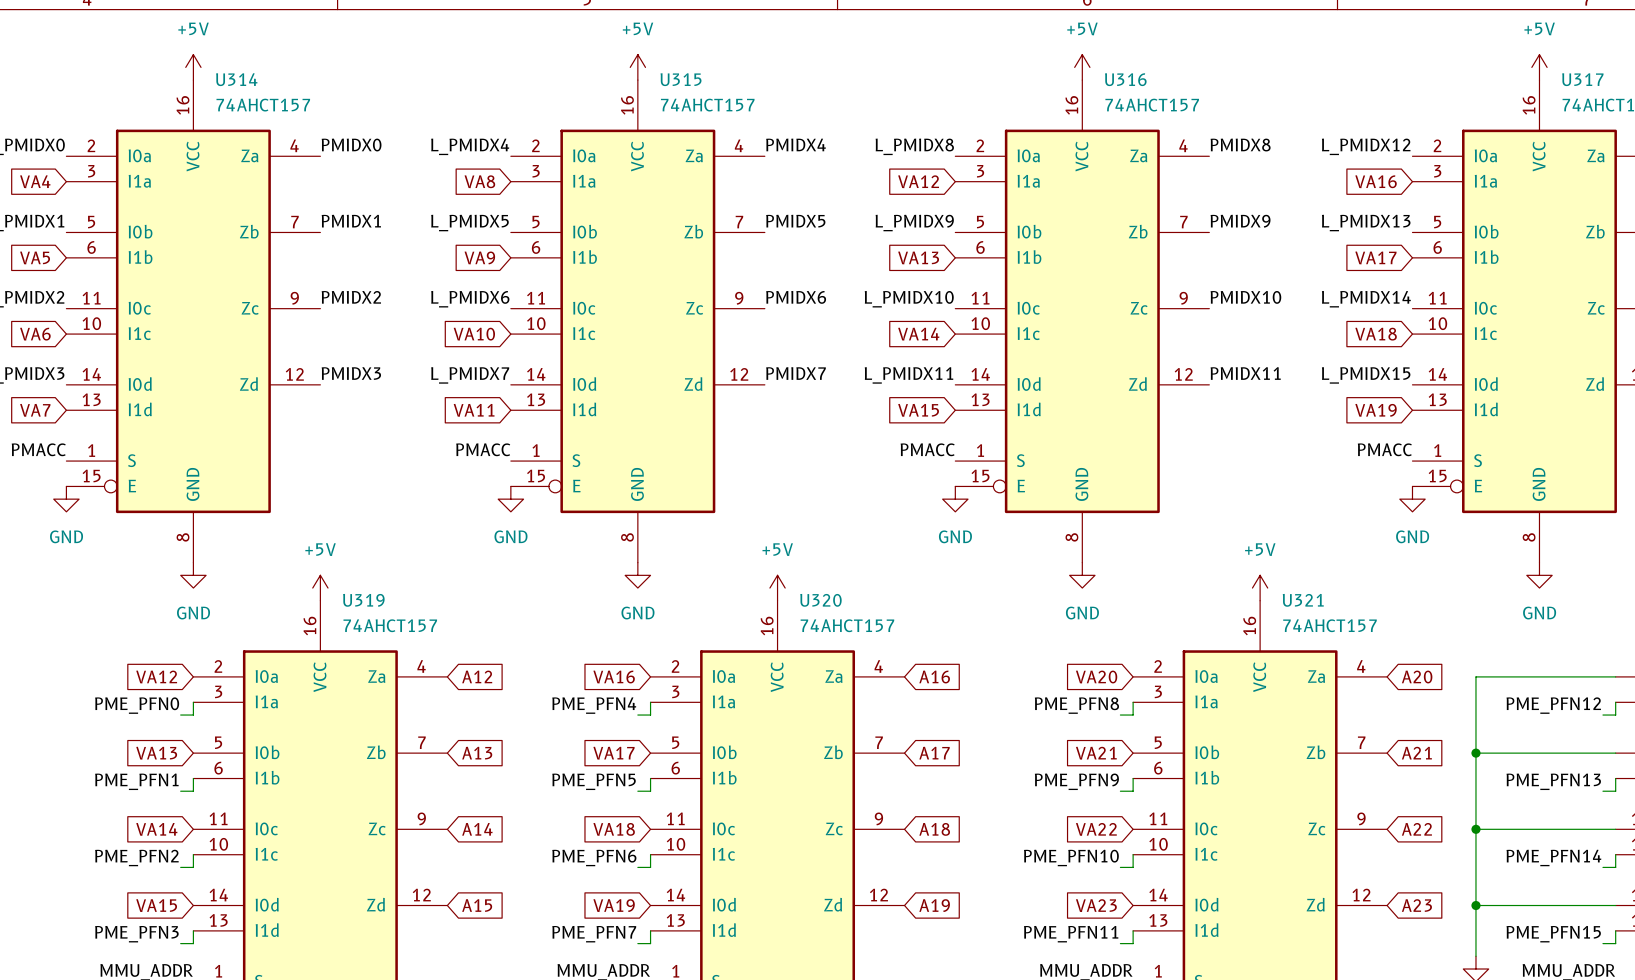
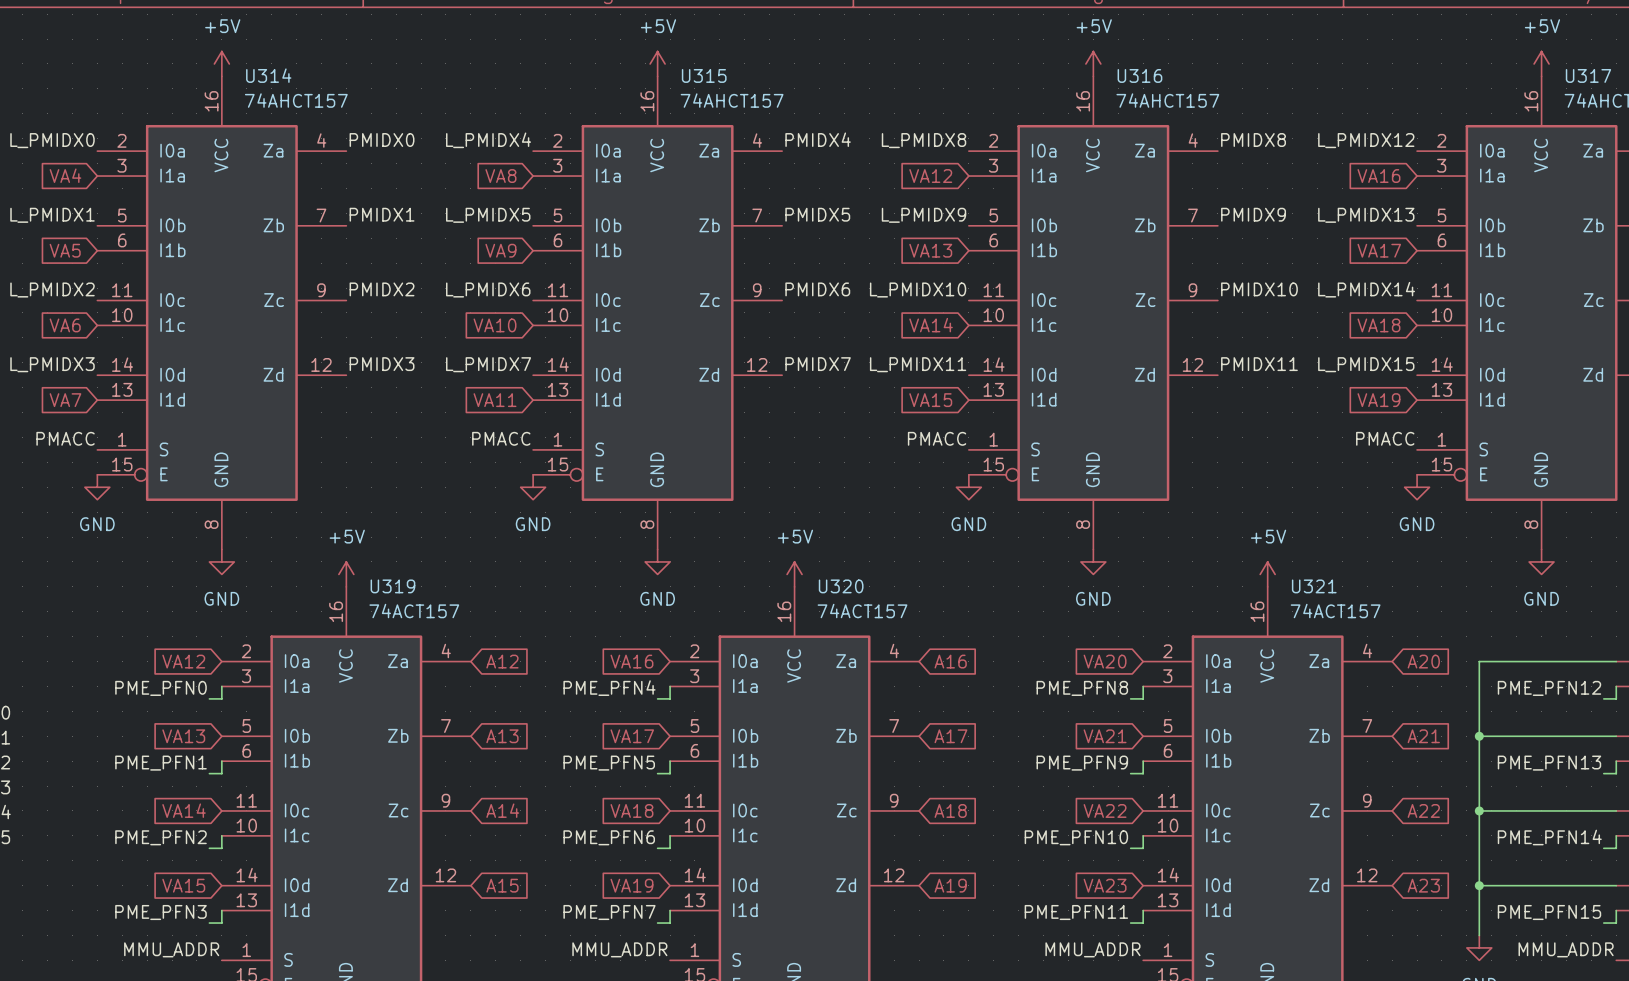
U319 value: 74AHCT157 (390, 625) -> 74ACT157 (414, 611)
U320 value: 74AHCT157 (847, 625) -> 74ACT157 (862, 611)
U321 value: 74AHCT157 (1329, 625) -> 74ACT157 (1335, 611)

